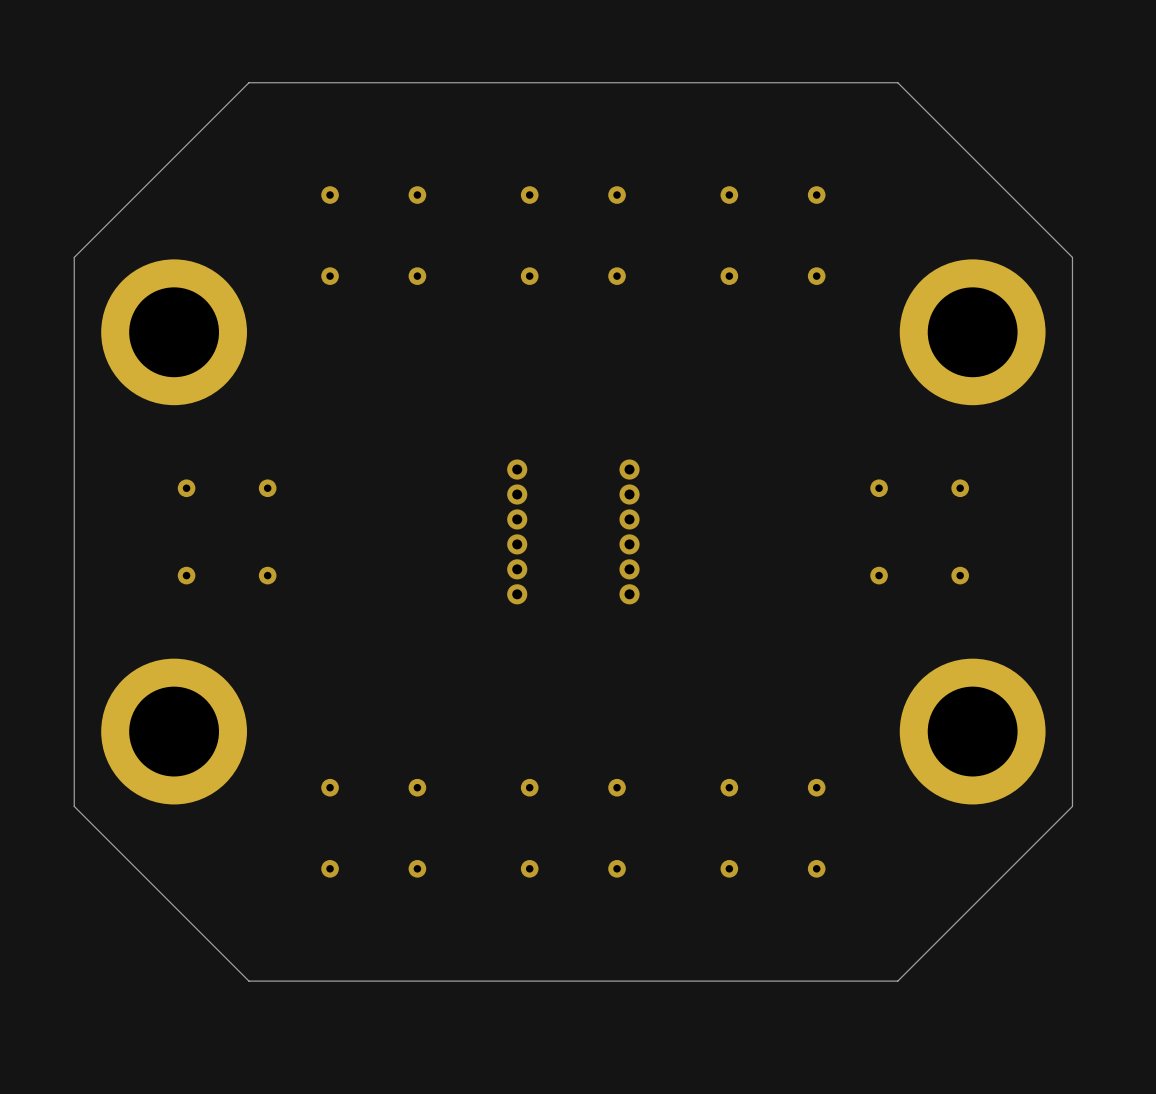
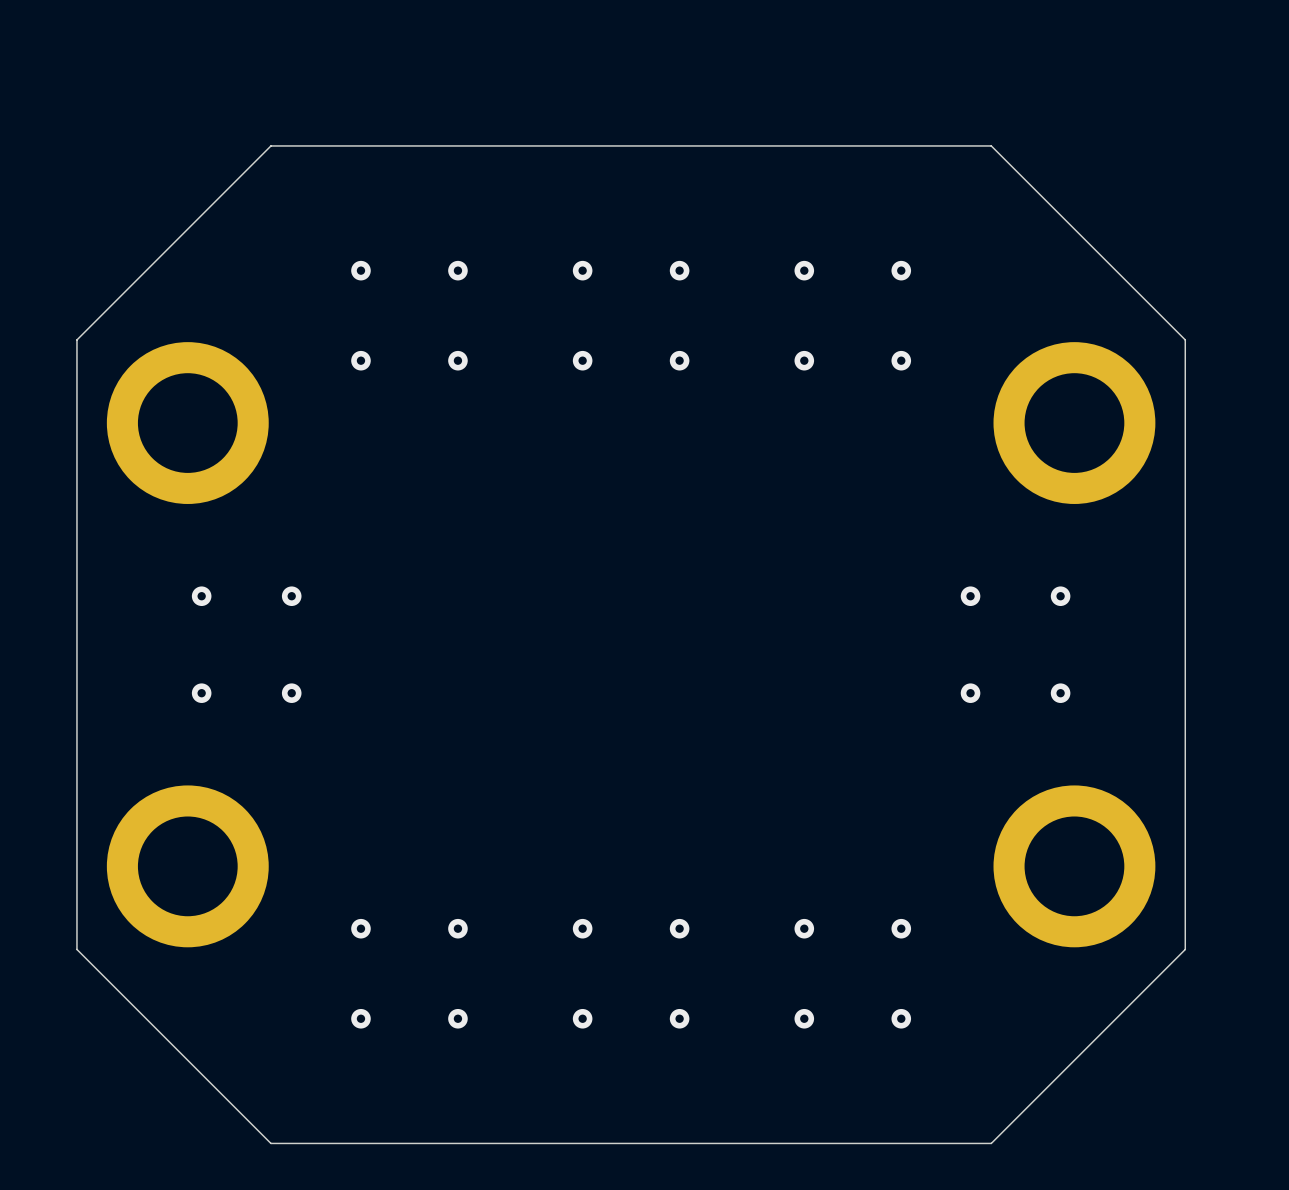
via: (517, 469) -> none
via: (629, 469) -> none
via: (517, 494) -> none
via: (629, 494) -> none
via: (517, 519) -> none
via: (629, 519) -> none
via: (517, 544) -> none
via: (629, 544) -> none
via: (517, 569) -> none
via: (629, 569) -> none
via: (517, 594) -> none
via: (629, 594) -> none

